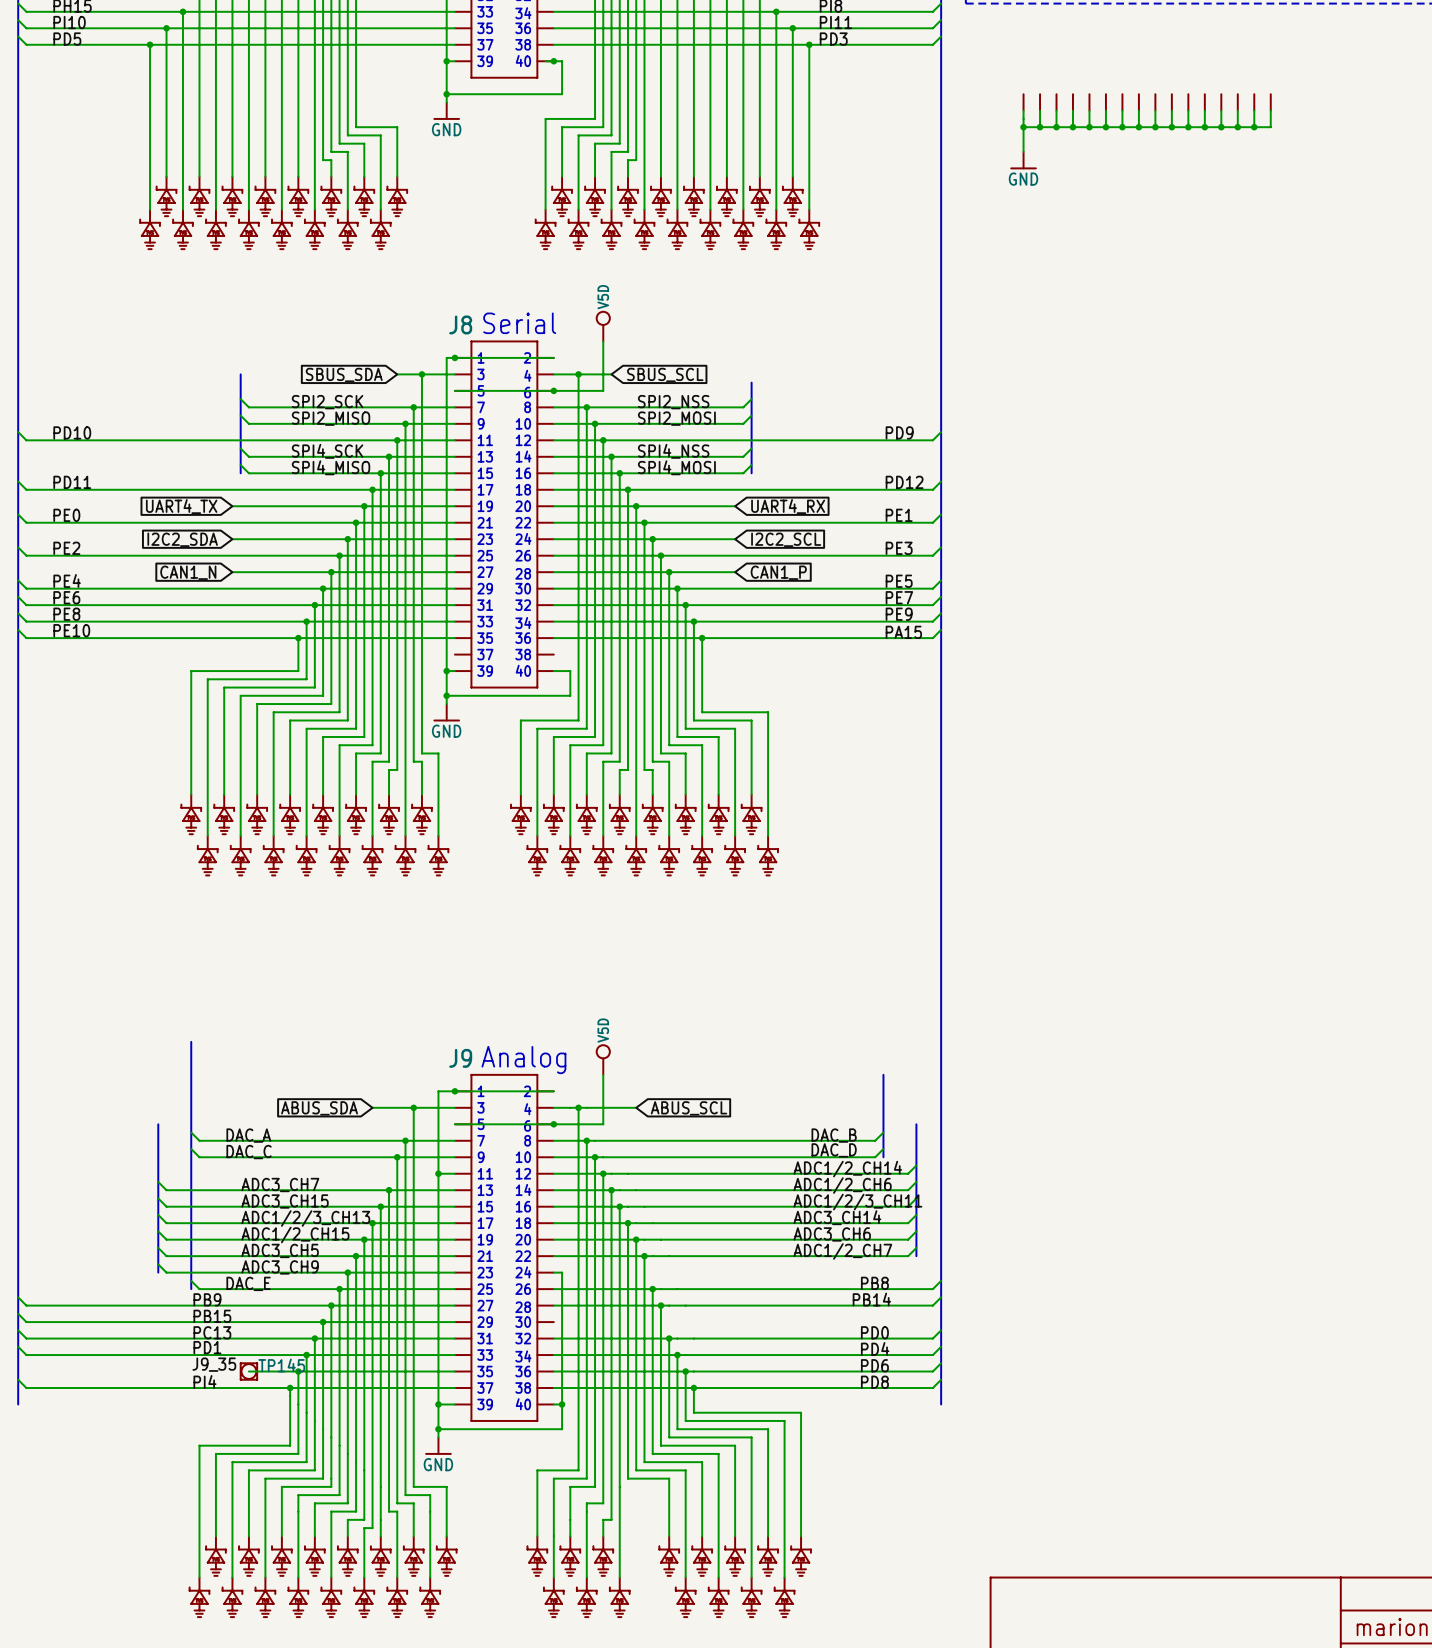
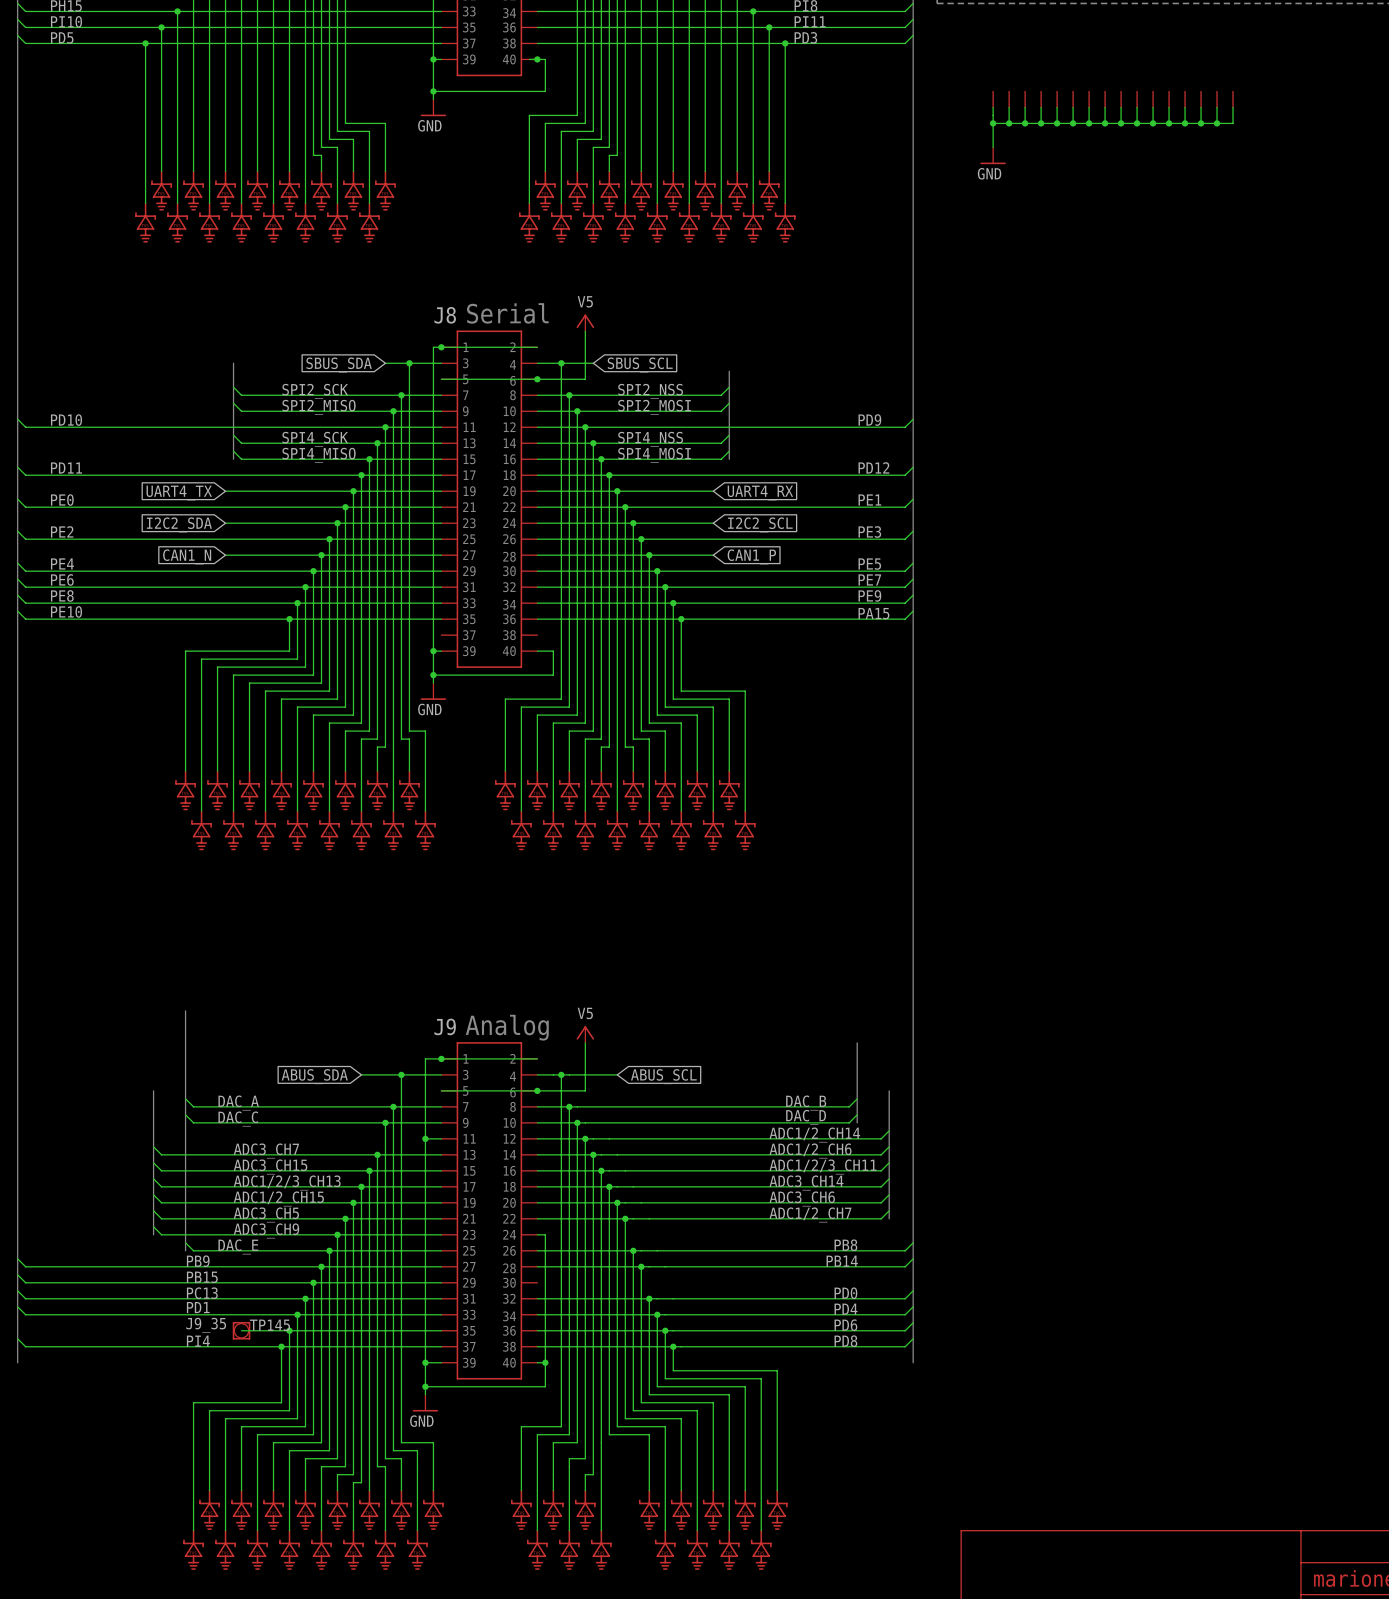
power symbol: (603, 326) -> none
power symbol: none -> V5 (585, 322)
power symbol: (603, 1059) -> none
power symbol: none -> V5 (585, 1034)

